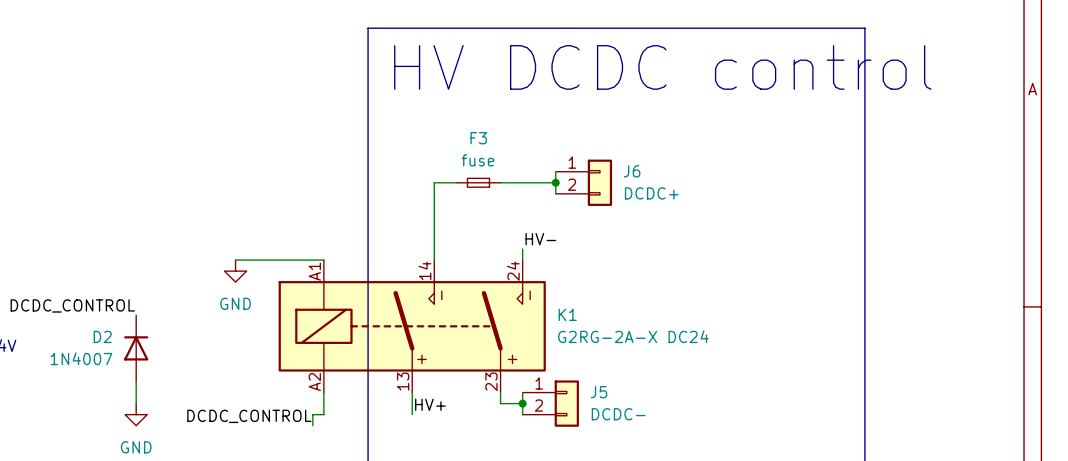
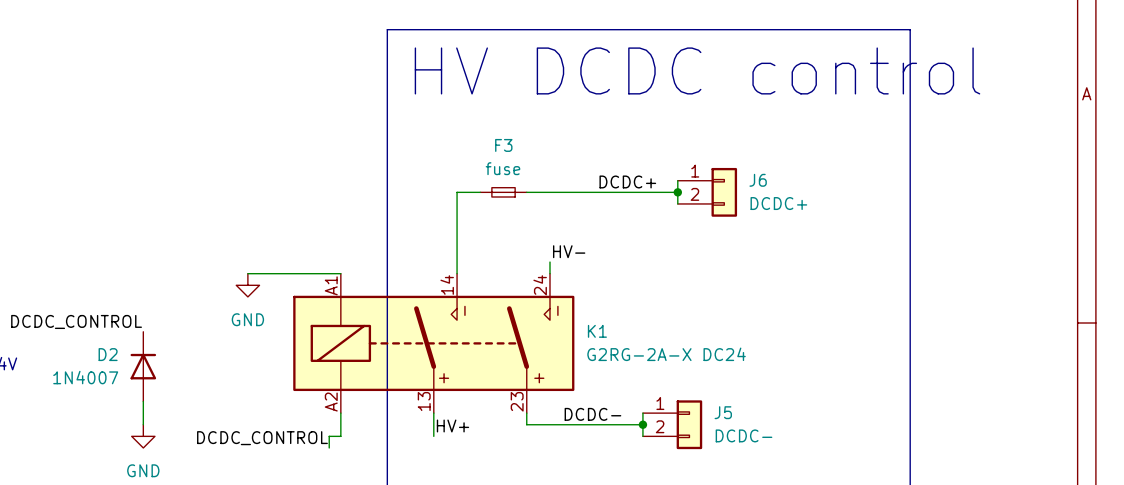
wire: (555, 171) (555, 193) -> (677, 180) (677, 203)
label: none -> DCDC+ (627, 181)
wire: none -> (584, 192) (677, 192)
junction: (555, 182) -> none
J6 position: (583, 182) -> (707, 192)
junction: none -> (677, 192)
wire: (522, 392) (522, 414) -> (642, 413) (642, 436)
label: none -> DCDC- (592, 414)
wire: none -> (549, 424) (642, 424)
junction: (522, 403) -> none
J5 position: (550, 403) -> (672, 424)
junction: none -> (642, 424)

